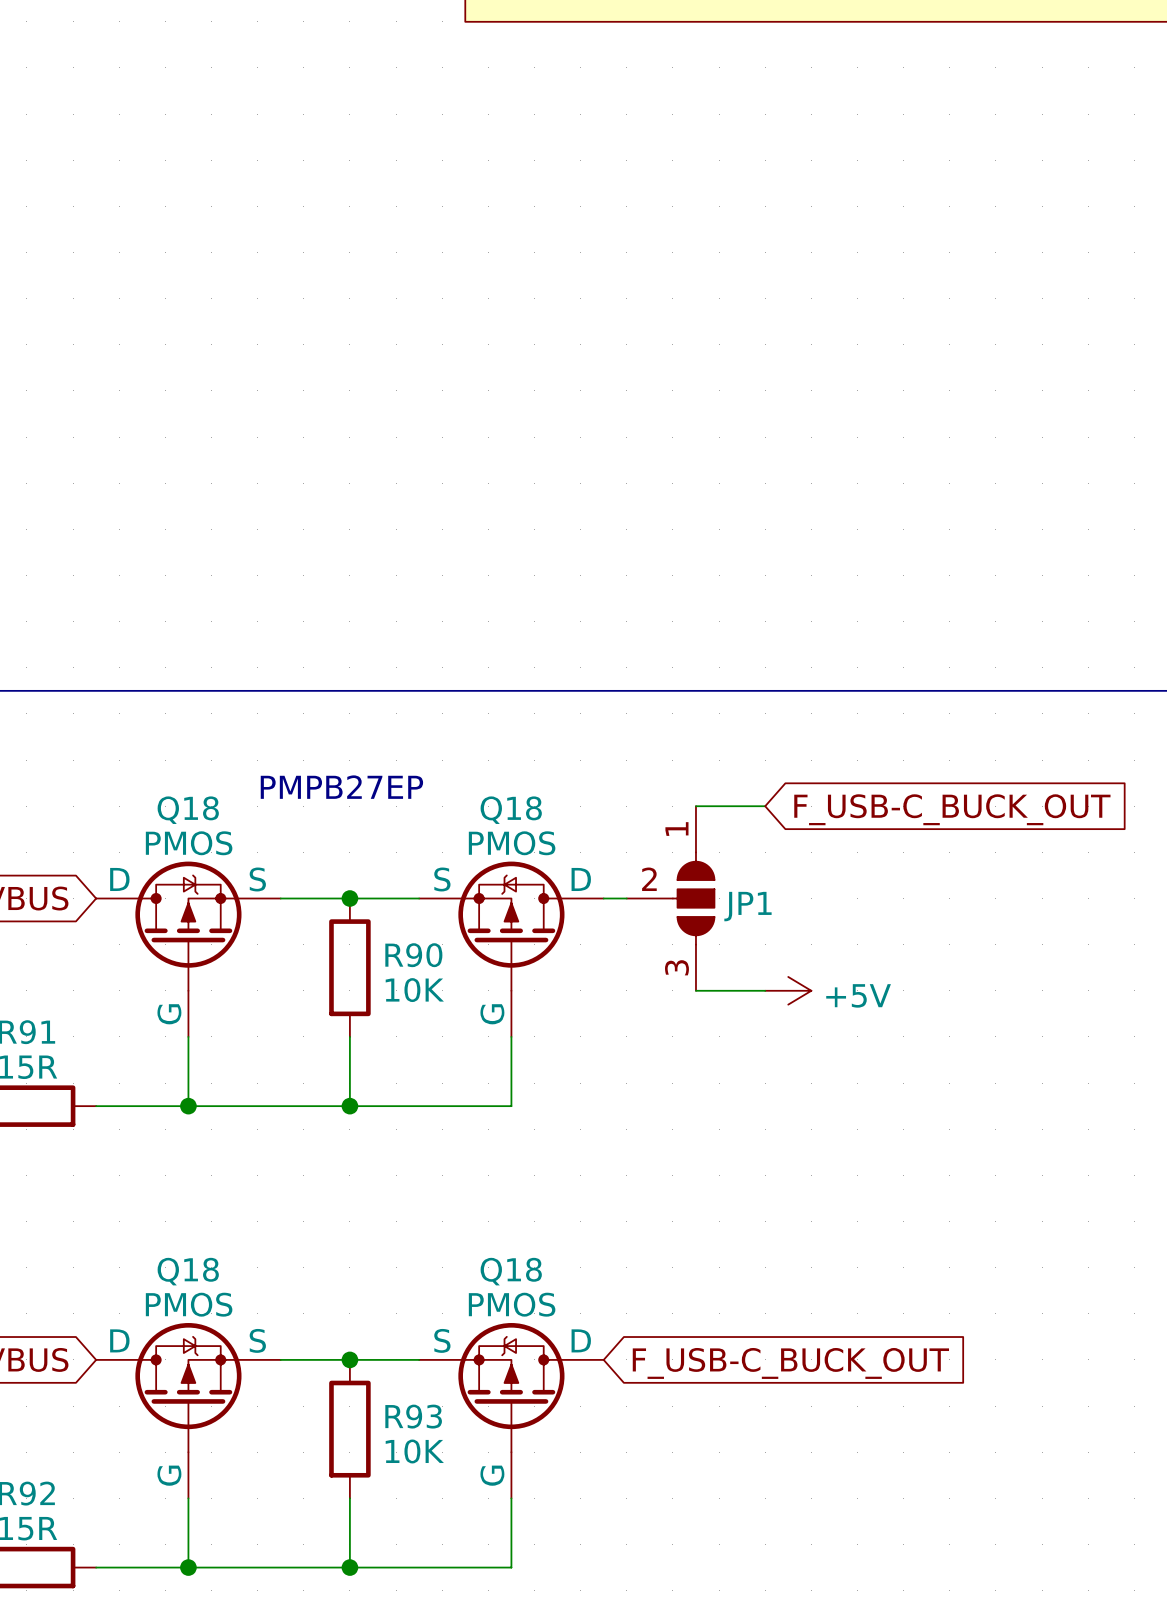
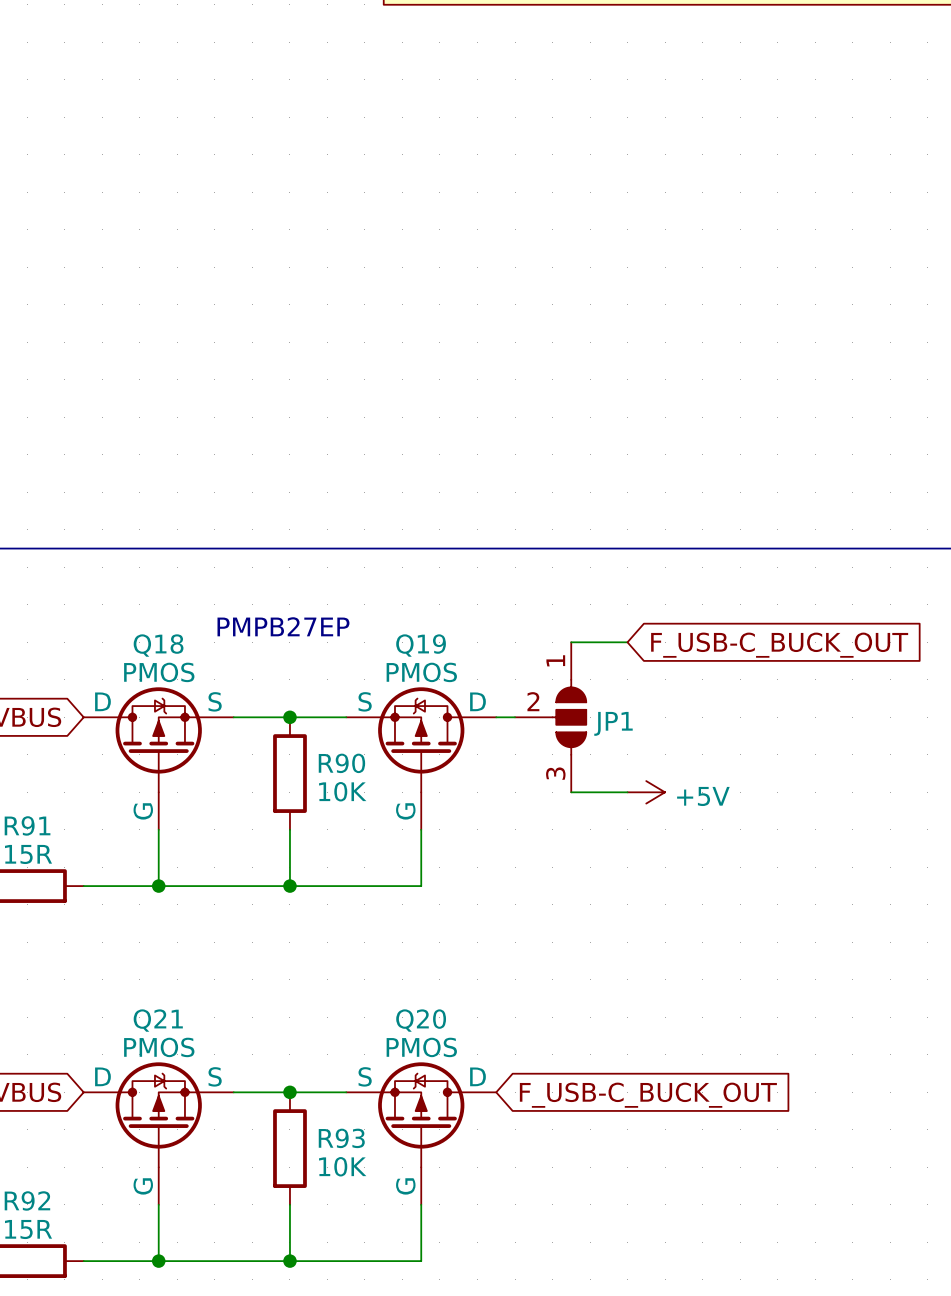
Q18 name: Q18 (511, 810) -> Q19 (421, 645)
Q18 name: Q18 (188, 1271) -> Q21 (158, 1020)
Q18 name: Q18 (511, 1271) -> Q20 (421, 1020)

